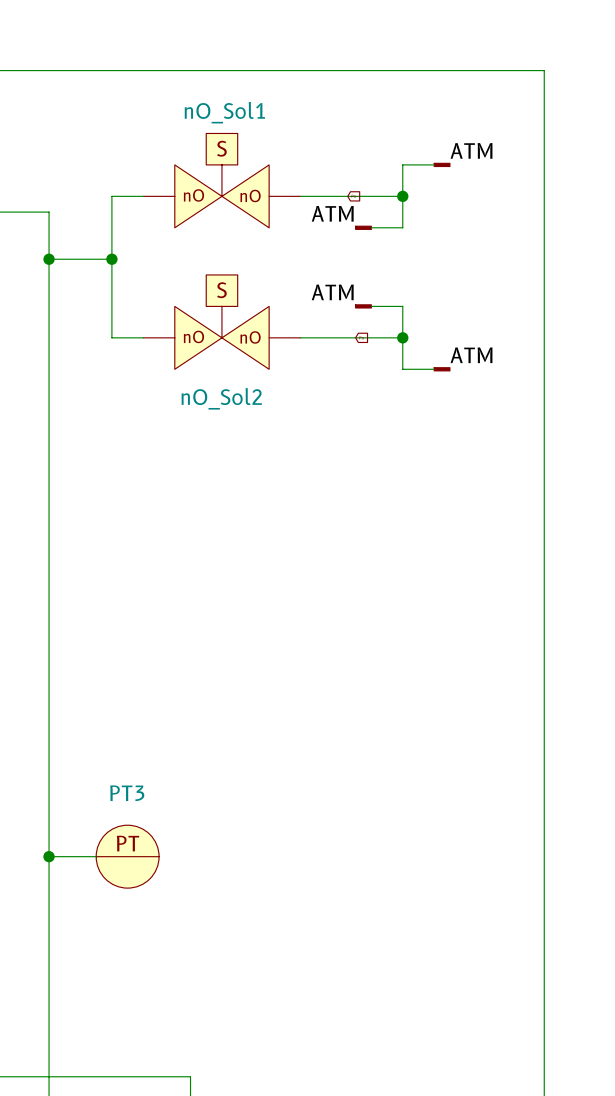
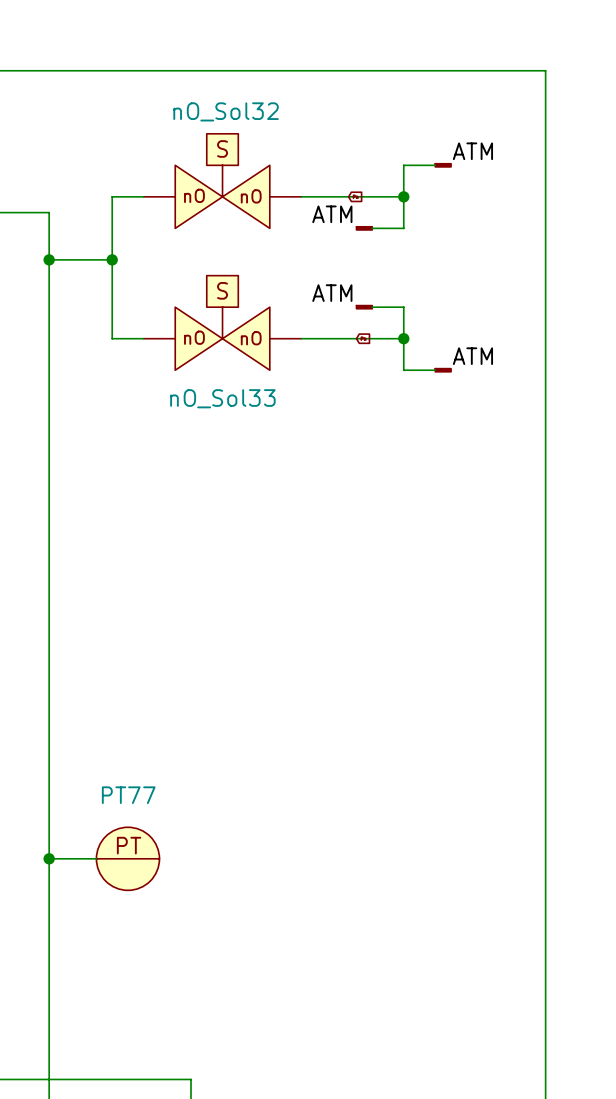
nO_Sol1 name: nO_Sol1 (224, 112) -> nO_Sol32 (226, 111)
nO_Sol2 name: nO_Sol2 (221, 398) -> nO_Sol33 (222, 398)
PT3 name: PT3 (127, 793) -> PT77 (128, 795)

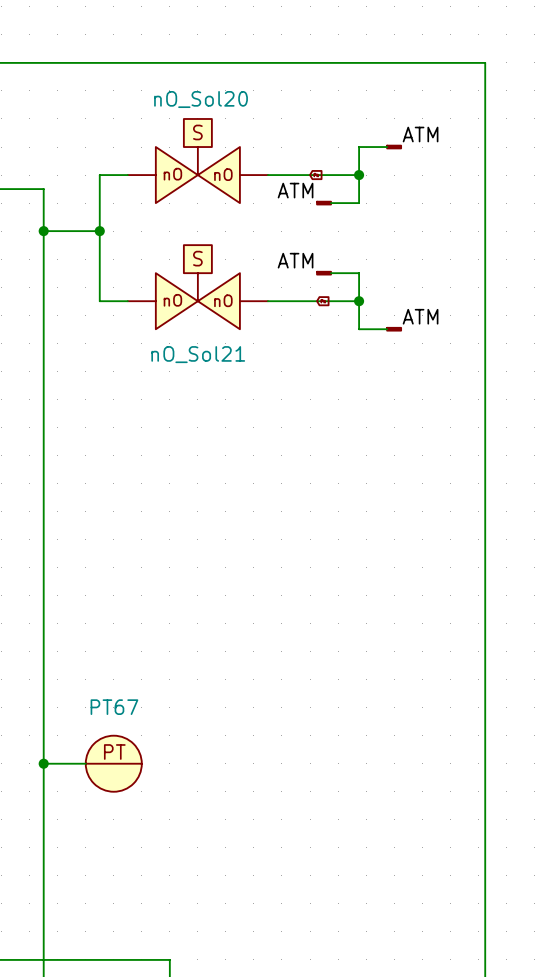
nO_Sol32 name: nO_Sol32 (226, 111) -> nO_Sol20 (201, 99)
nO_Sol33 name: nO_Sol33 (222, 398) -> nO_Sol21 (198, 354)
PT77 name: PT77 (128, 795) -> PT67 (114, 707)

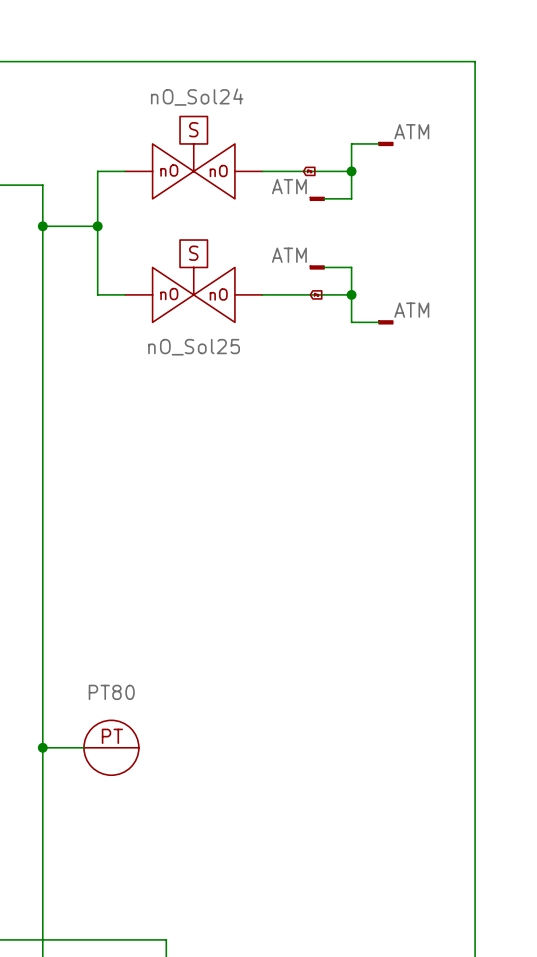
nO_Sol20 name: nO_Sol20 (201, 99) -> nO_Sol24 (197, 97)
nO_Sol21 name: nO_Sol21 (198, 354) -> nO_Sol25 (194, 347)
PT67 name: PT67 (114, 707) -> PT80 (111, 692)

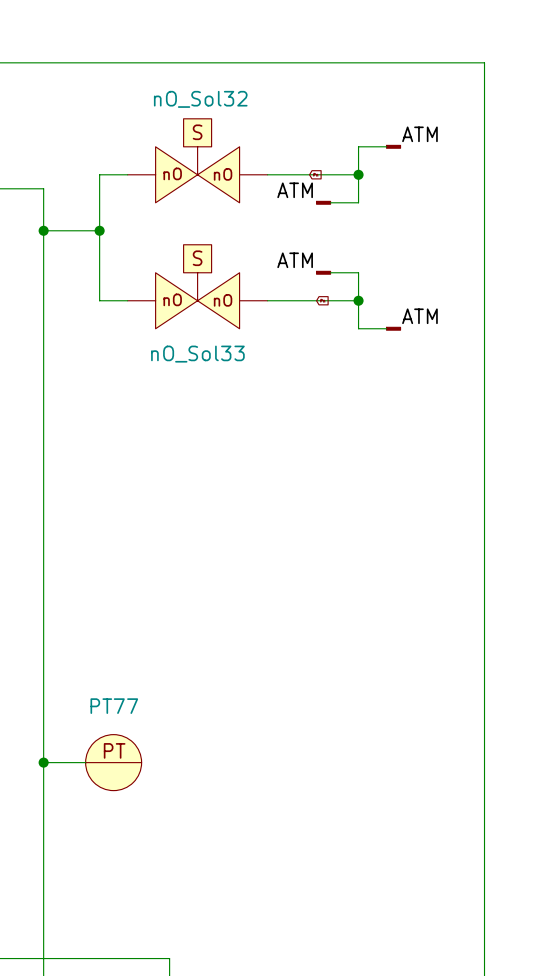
nO_Sol24 name: nO_Sol24 (197, 97) -> nO_Sol32 (200, 99)
nO_Sol25 name: nO_Sol25 (194, 347) -> nO_Sol33 (197, 354)
PT80 name: PT80 (111, 692) -> PT77 (114, 706)

